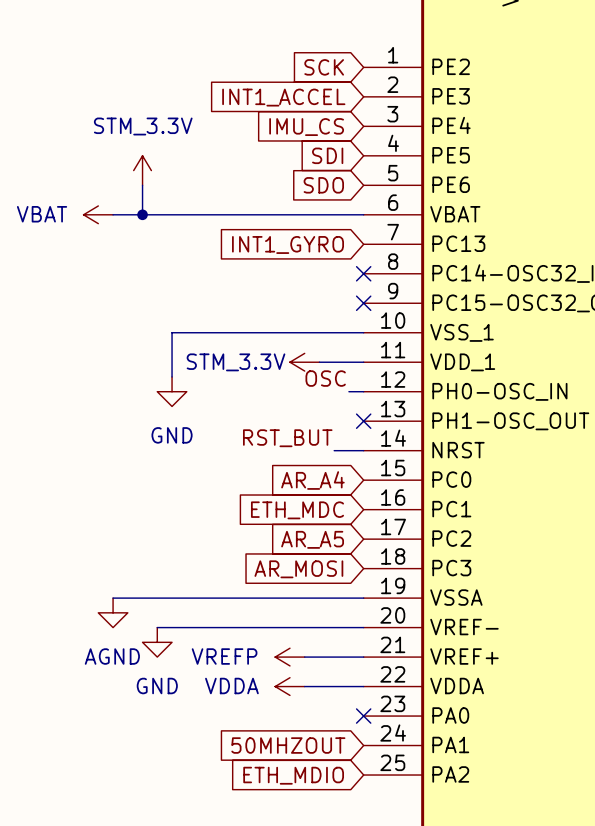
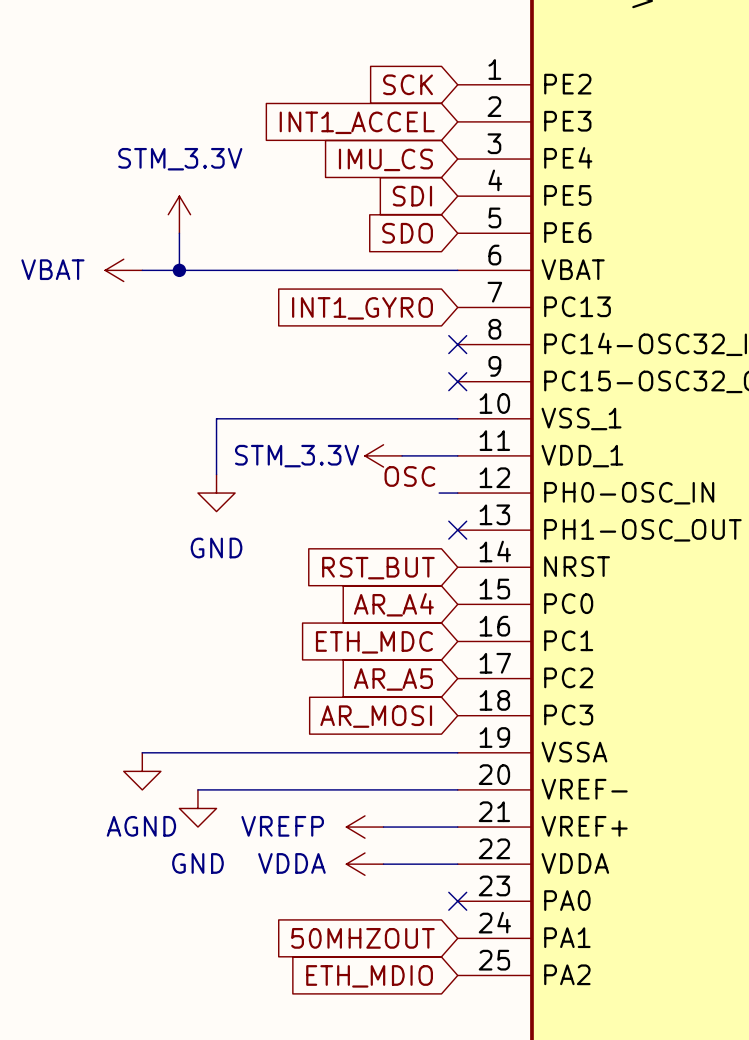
label: RST_BUT (287, 438) -> none
wire: (334, 450) (363, 450) -> none
global label: none -> RST_BUT (378, 568)

